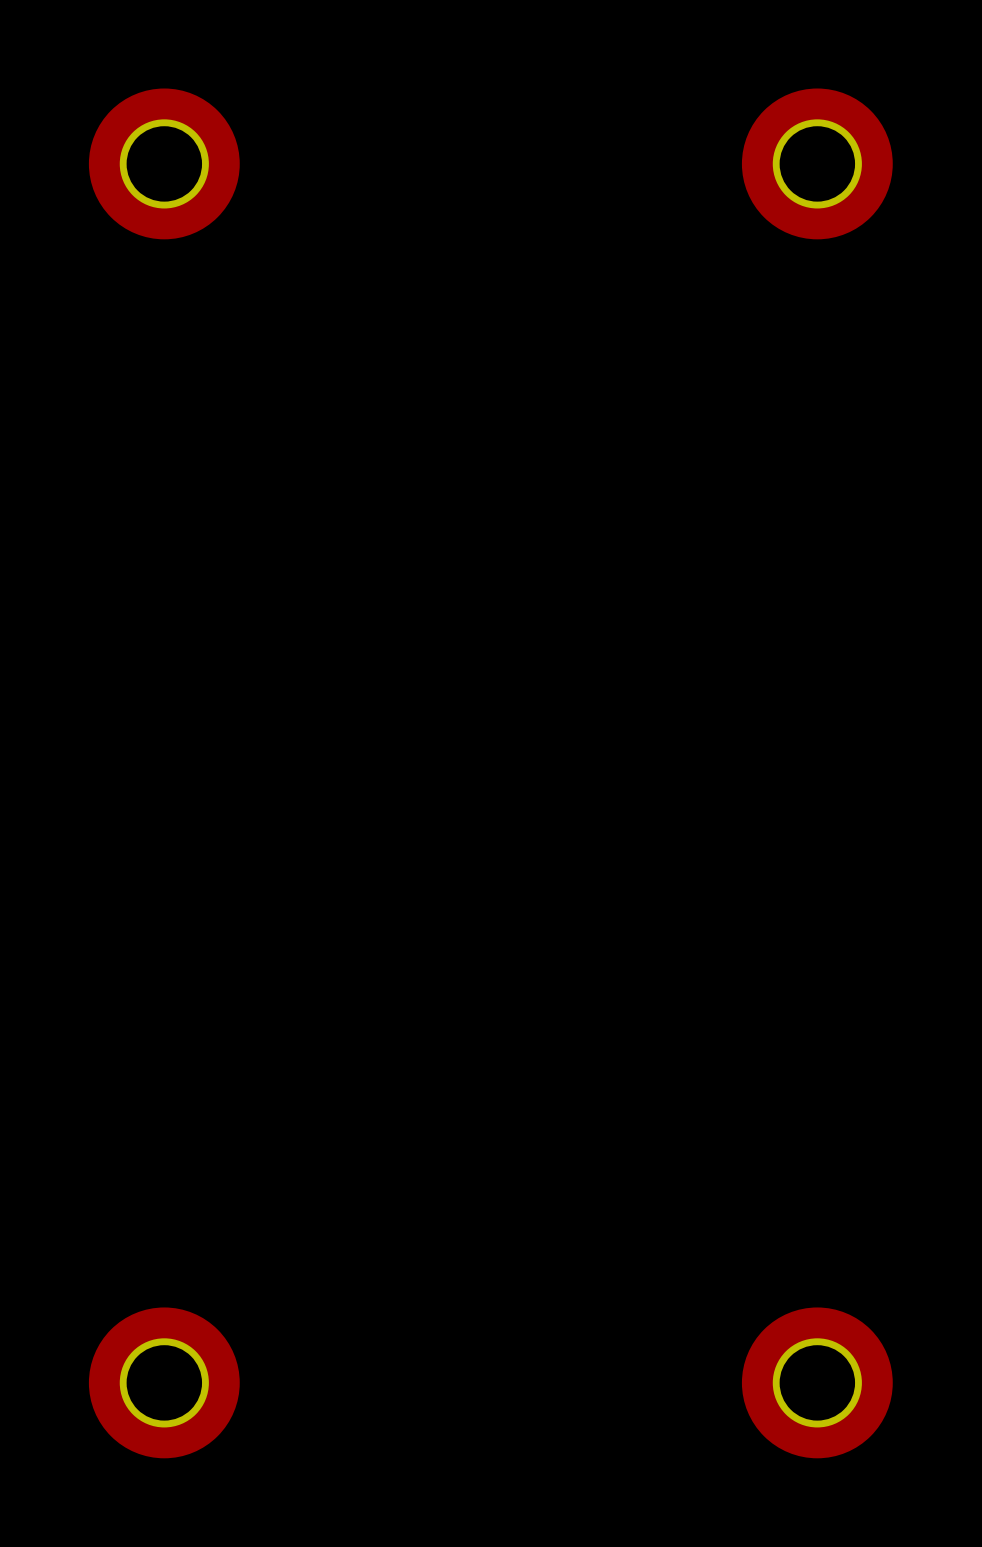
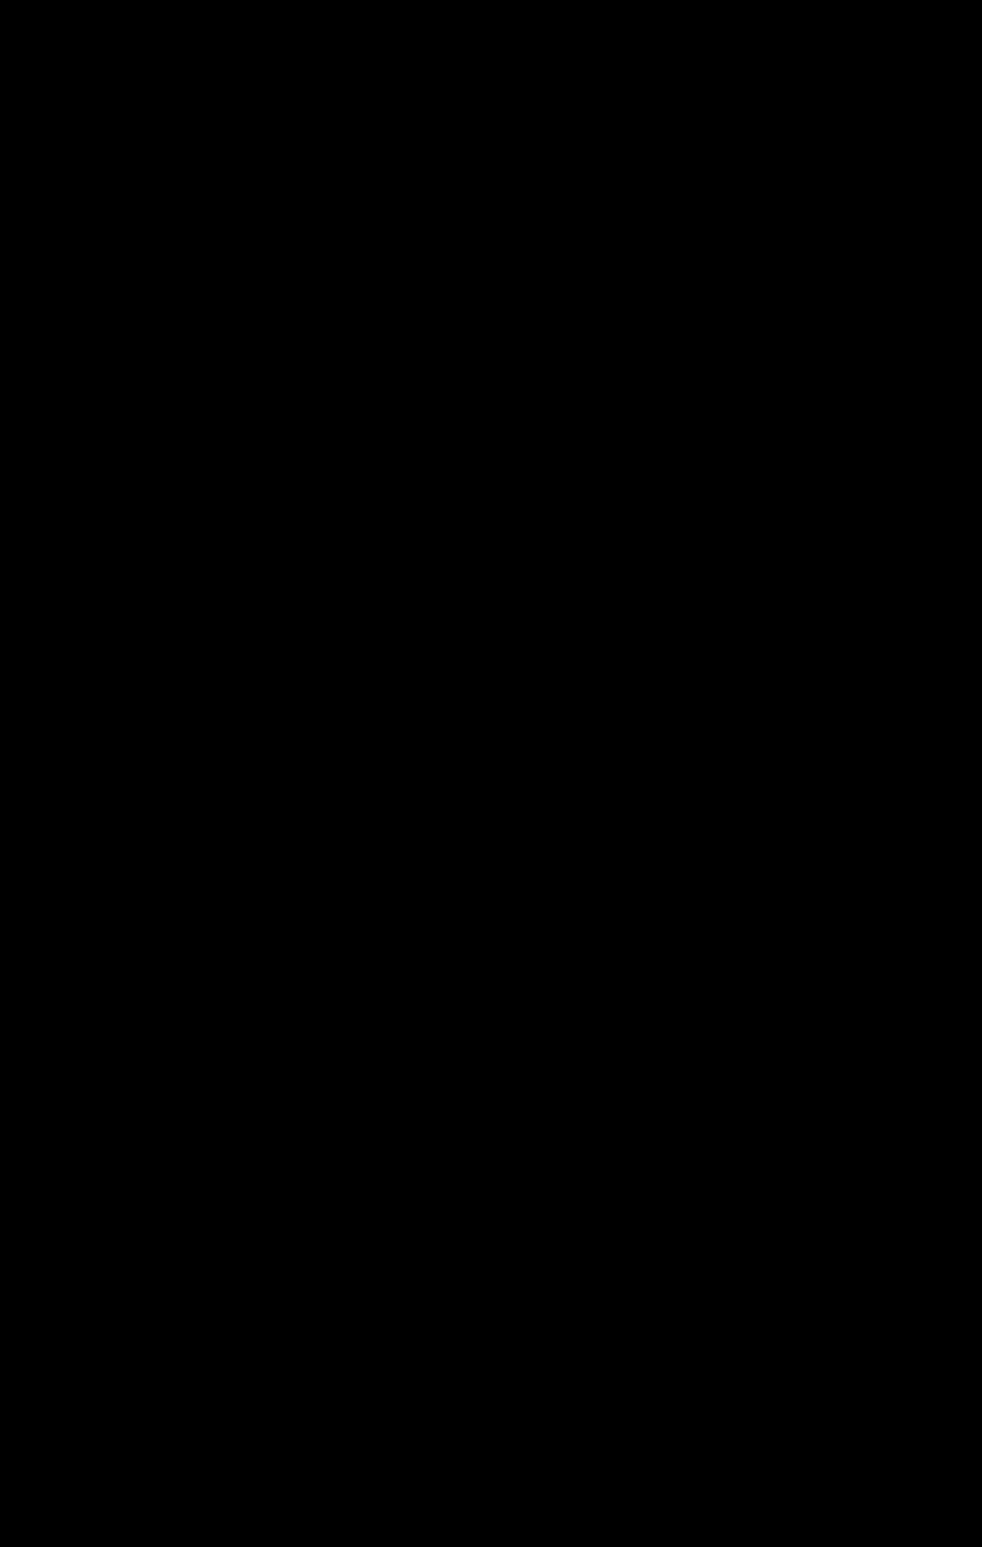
part: (164, 163) -> none
part: (817, 163) -> none
part: (164, 1382) -> none
part: (817, 1382) -> none

